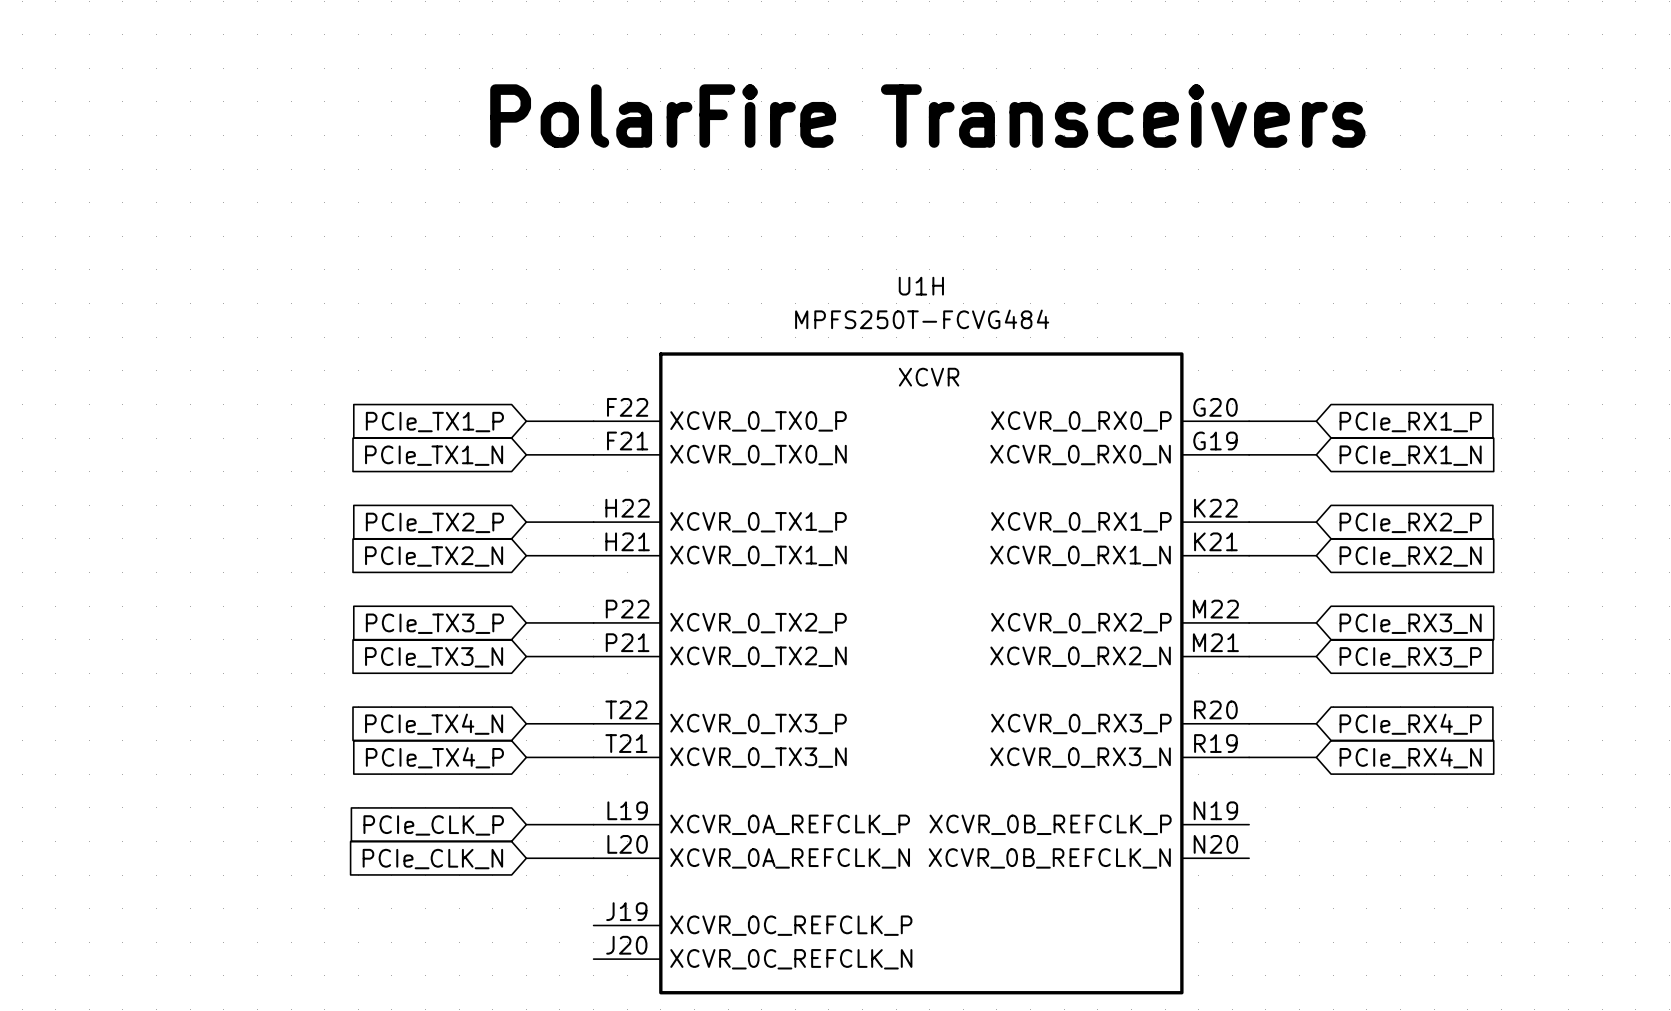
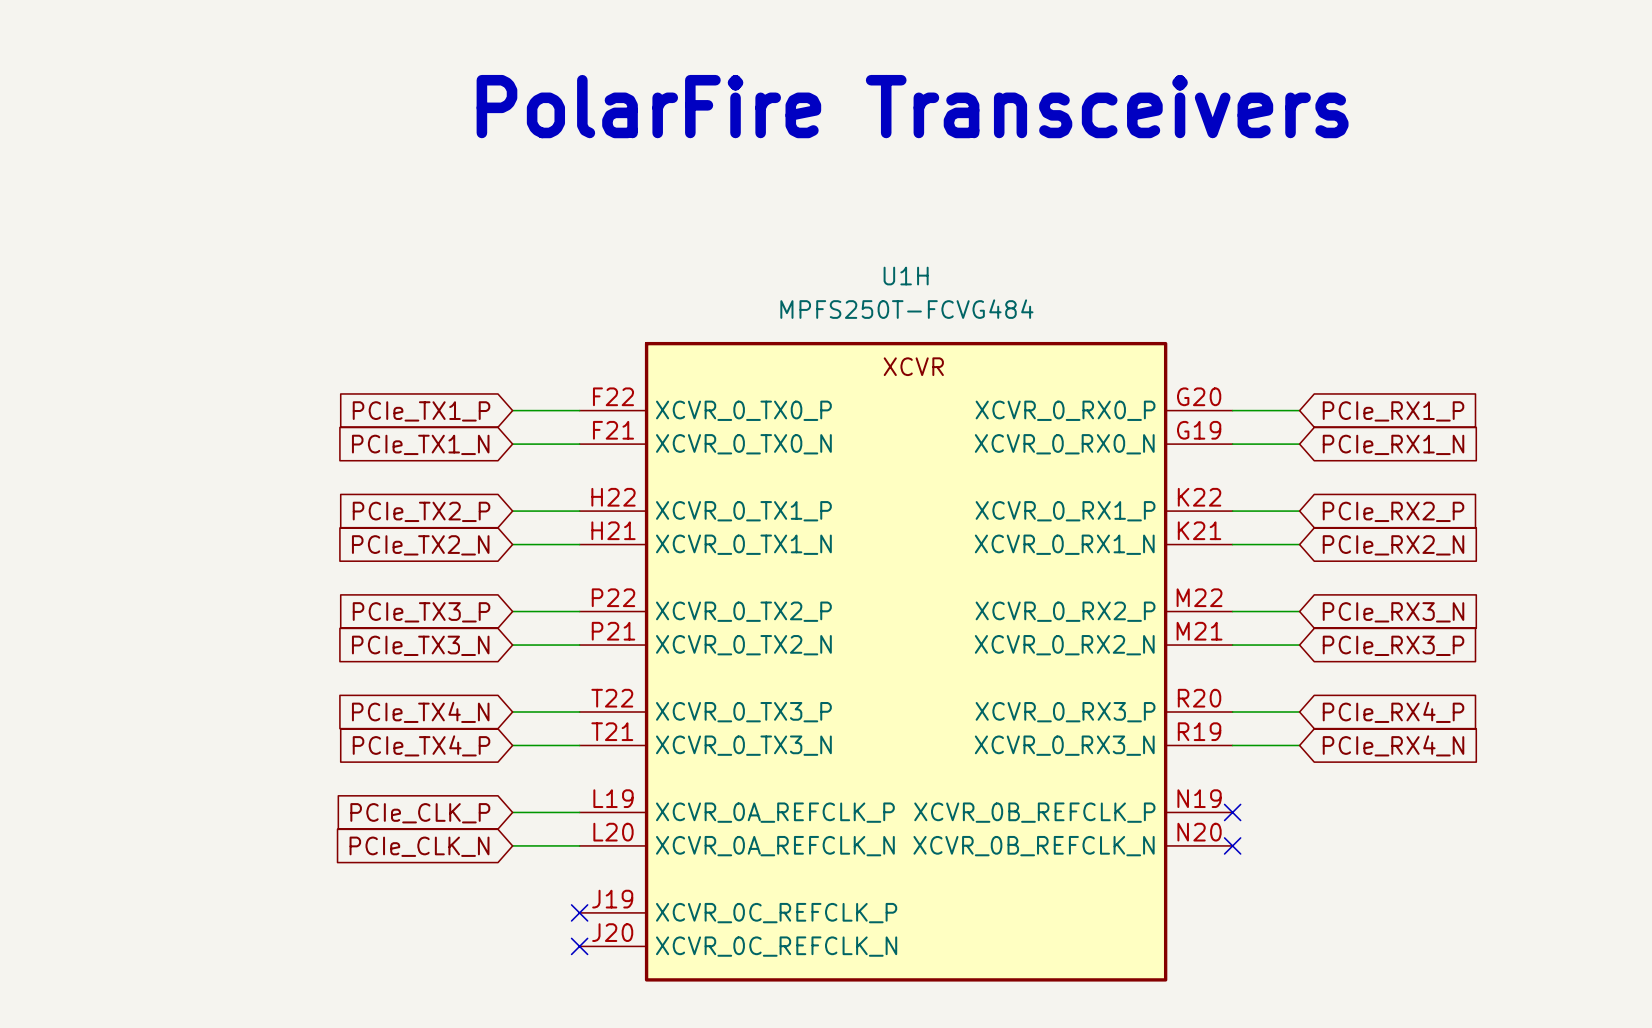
no-connect mark: none -> (1232, 812)
no-connect mark: none -> (1232, 845)
no-connect mark: none -> (579, 912)
no-connect mark: none -> (579, 946)

